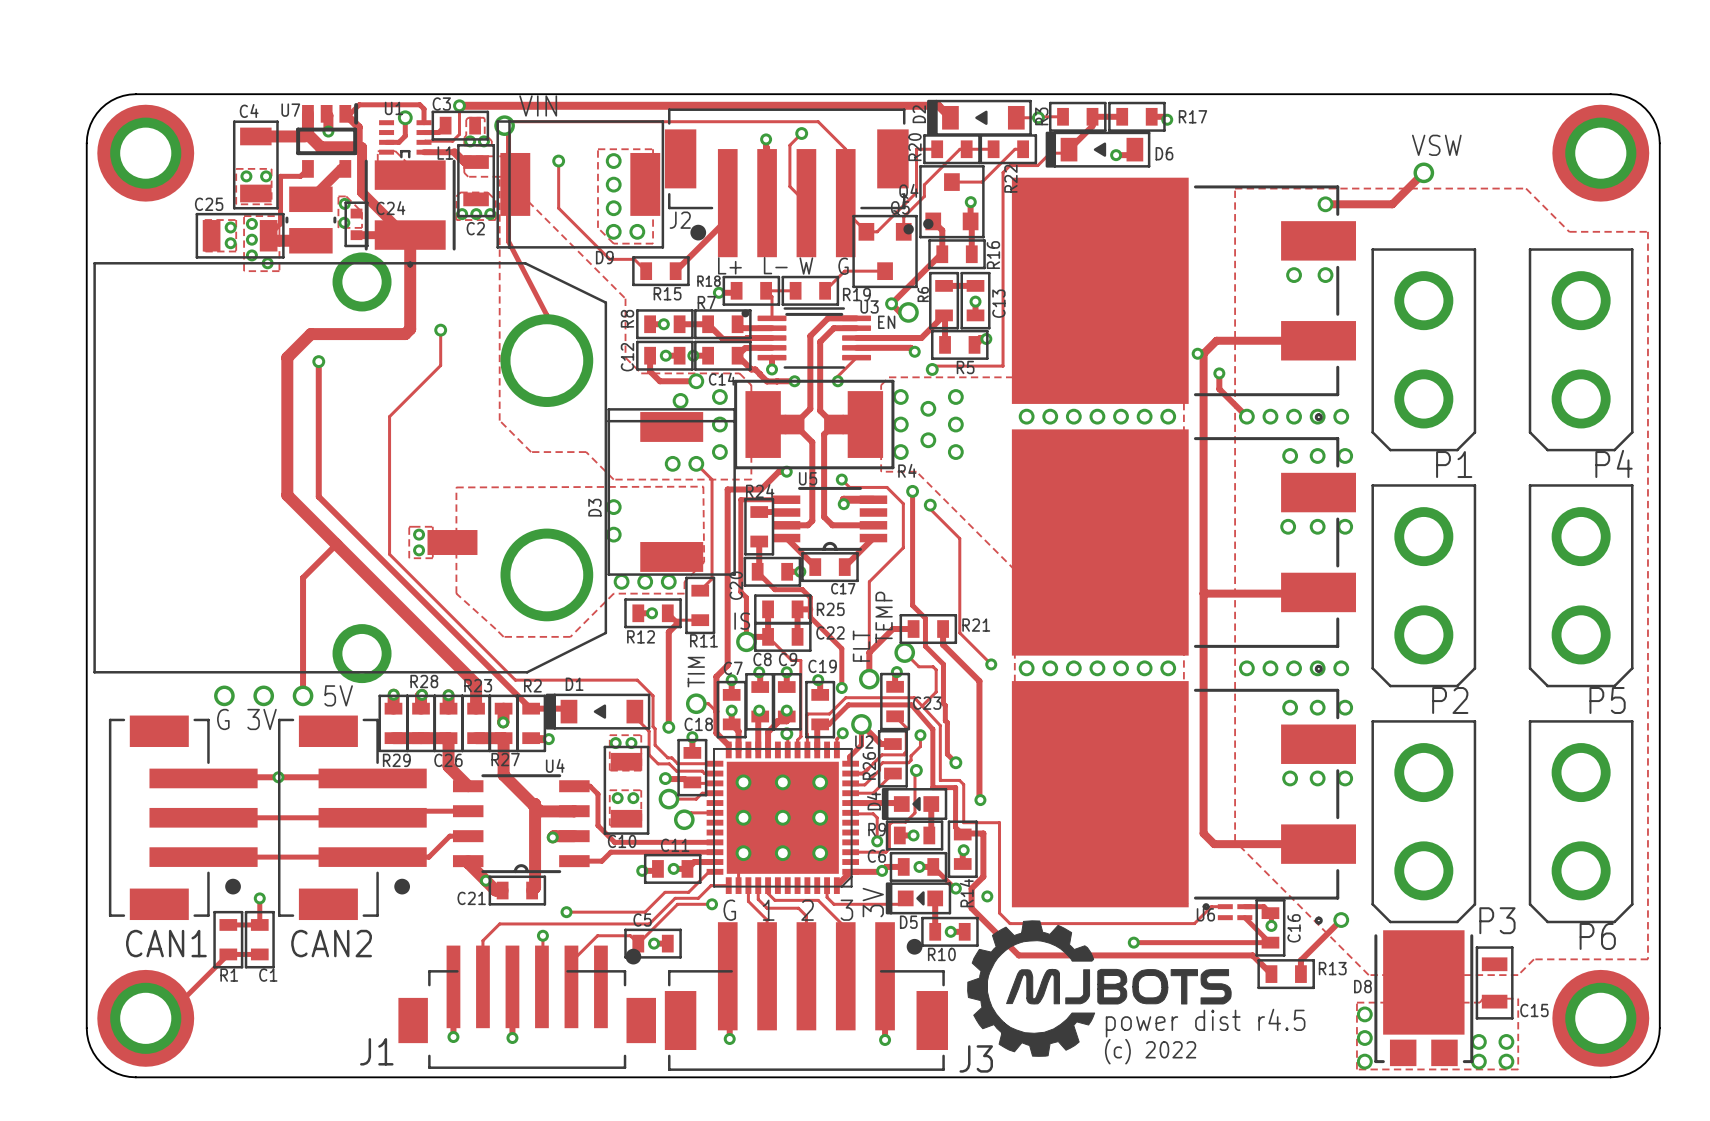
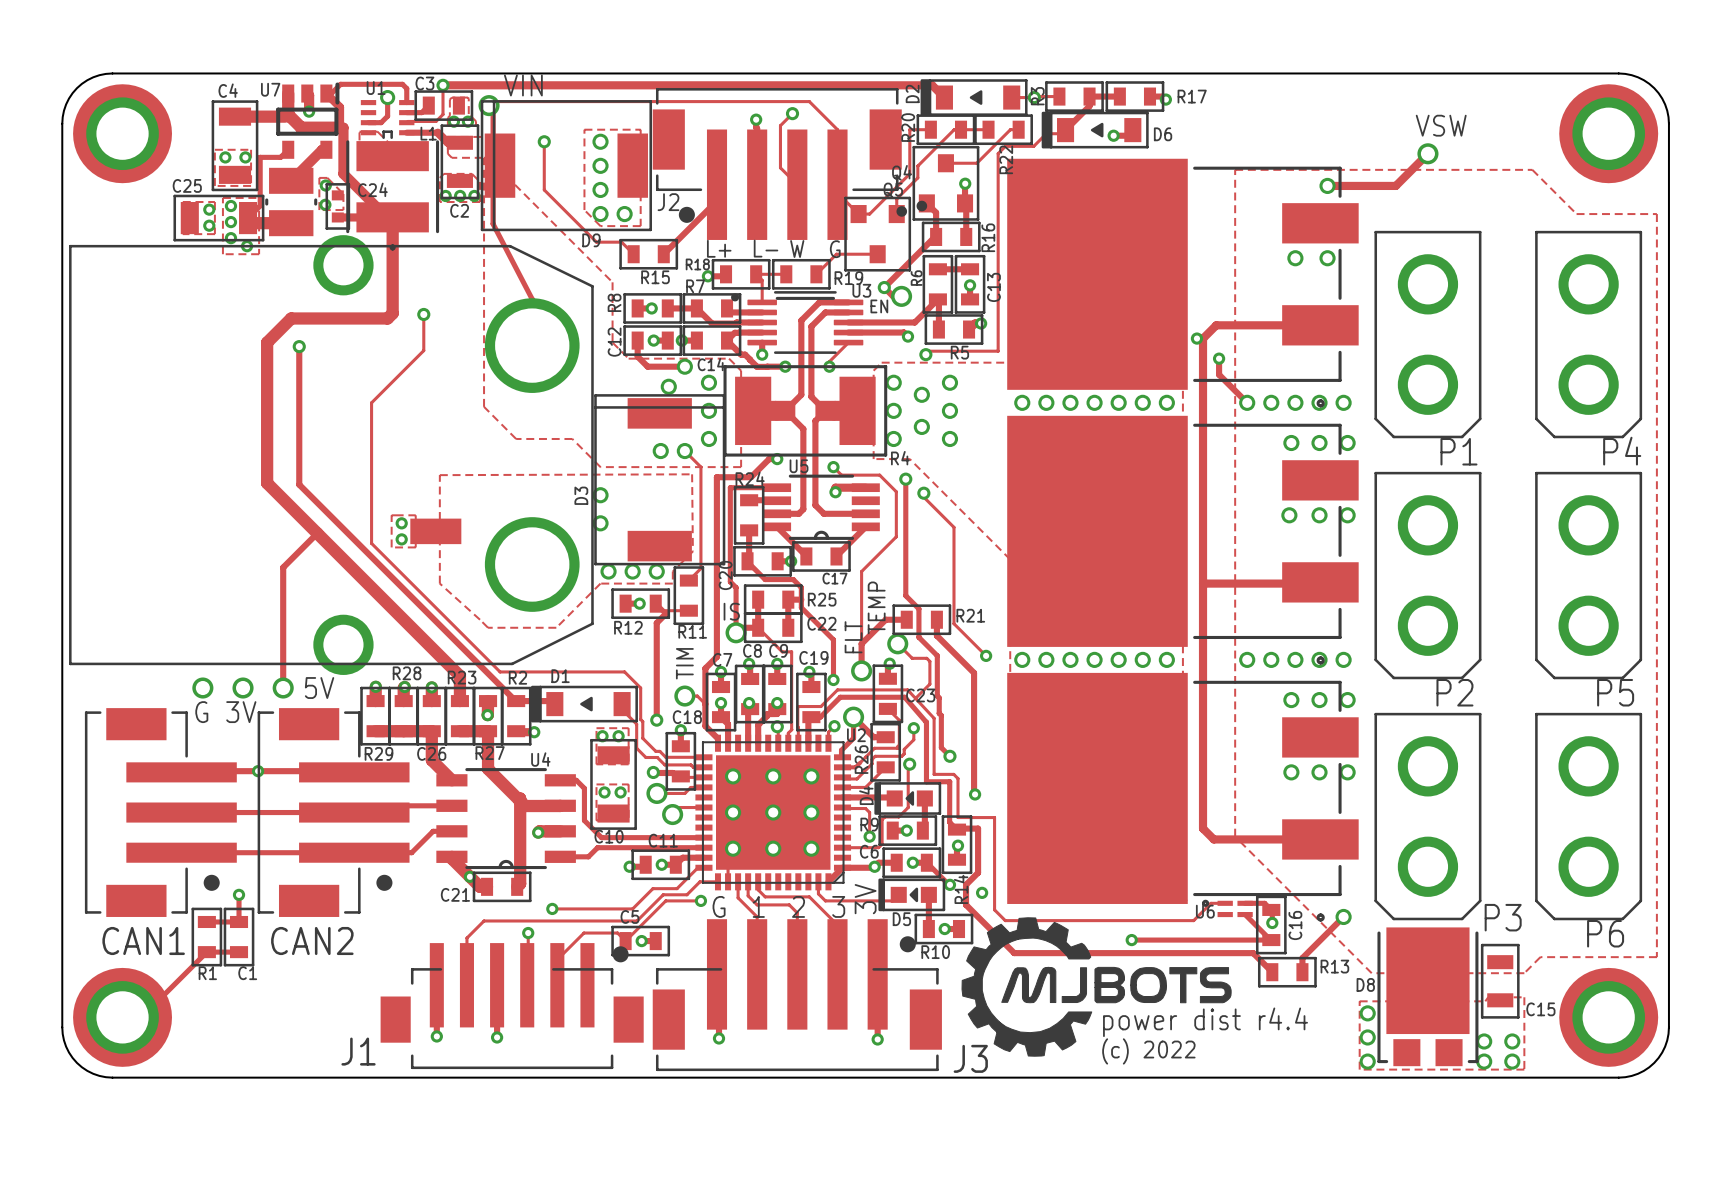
text: power dist r4.5 (1205, 1023) -> power dist r4.4 (1205, 1022)

